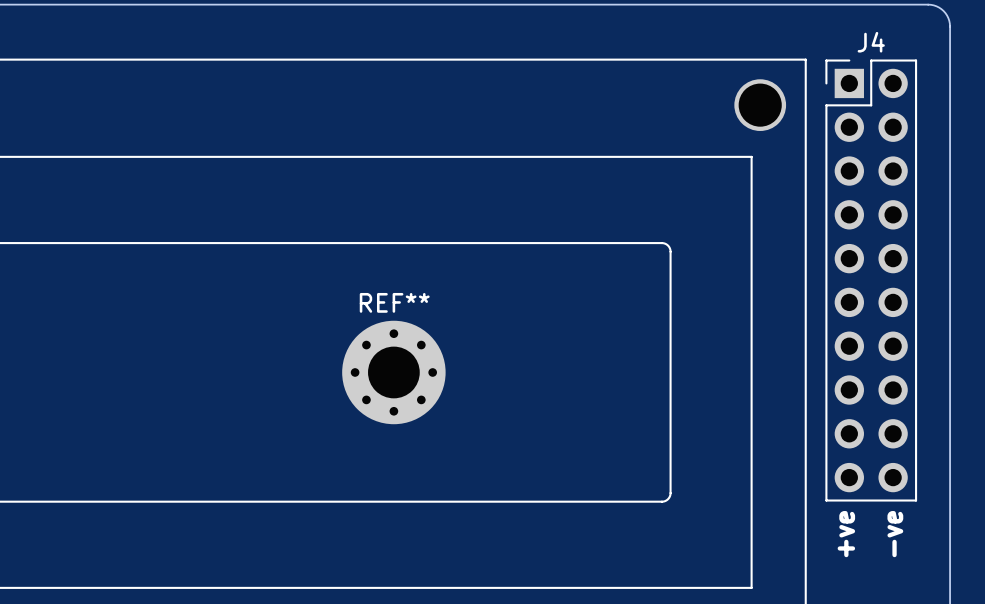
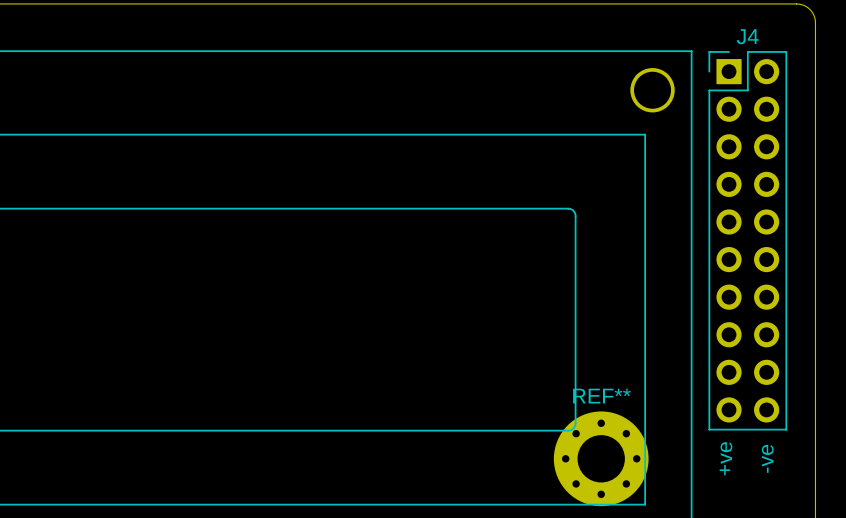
REF**: (393, 372) -> none
REF**: none -> (601, 458)

